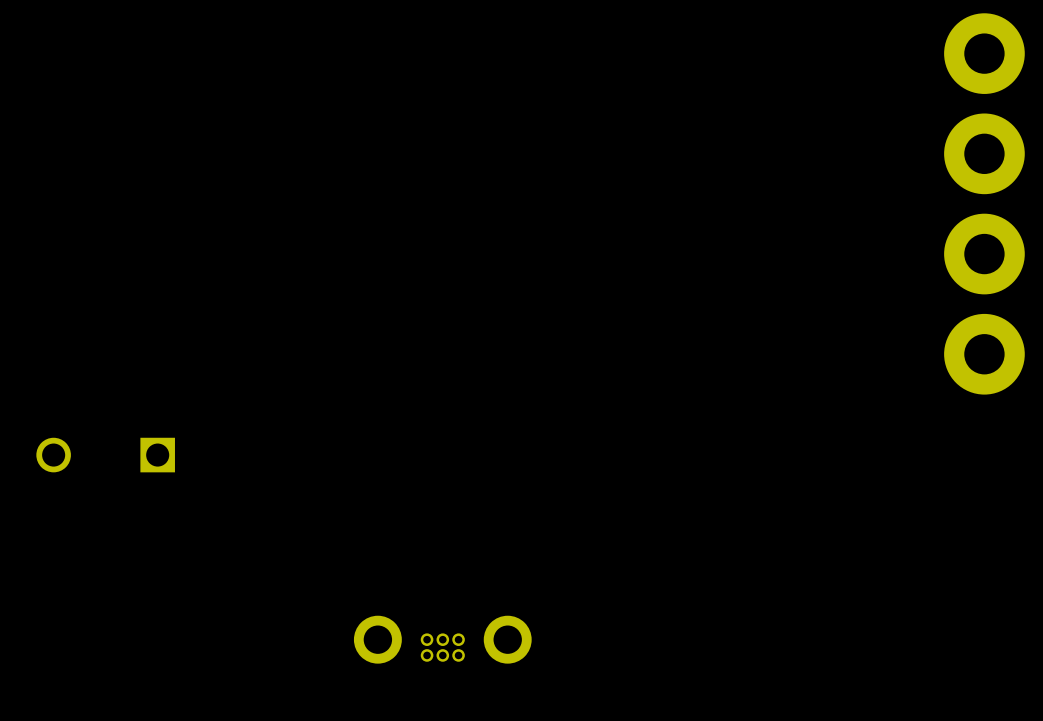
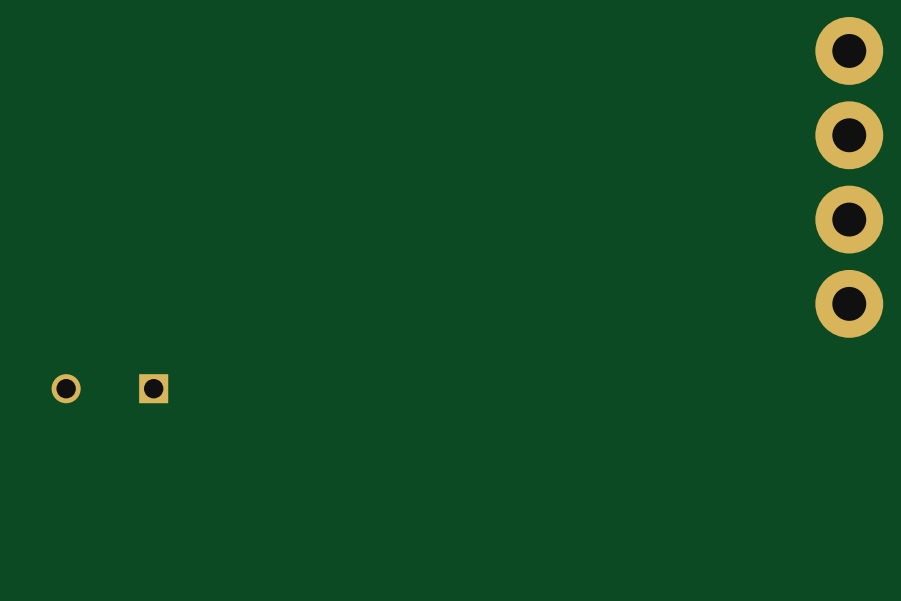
part: (442, 639) -> none

